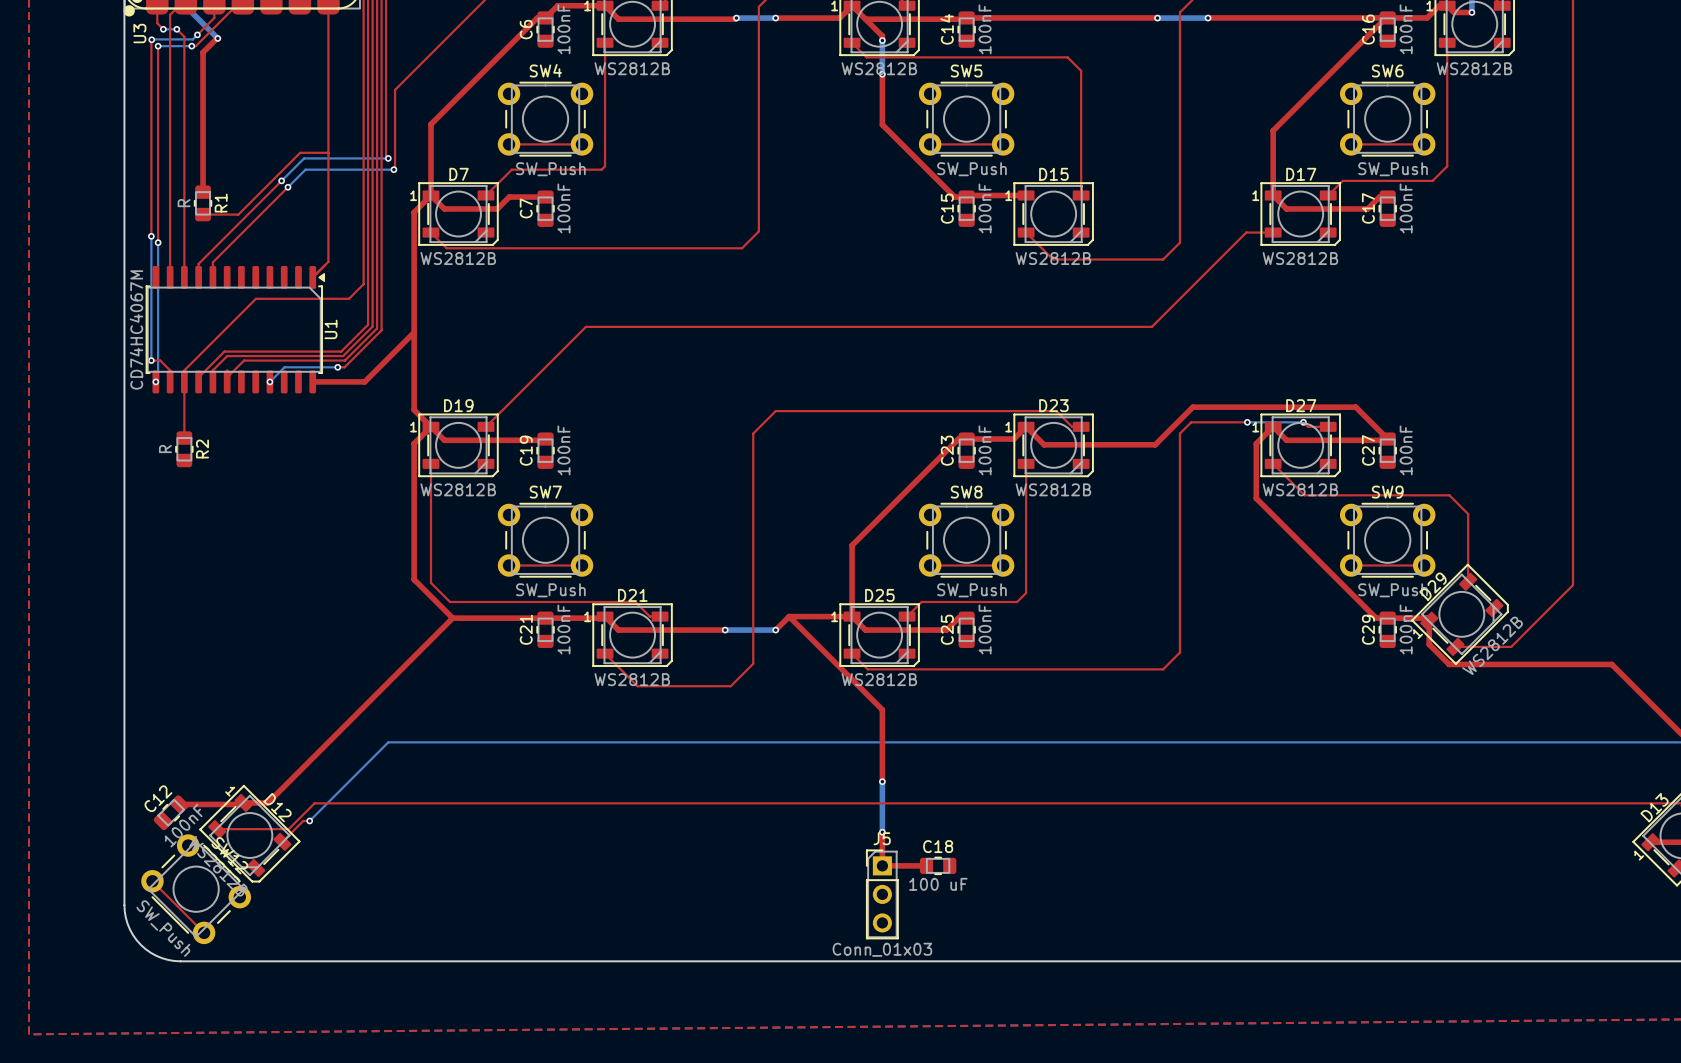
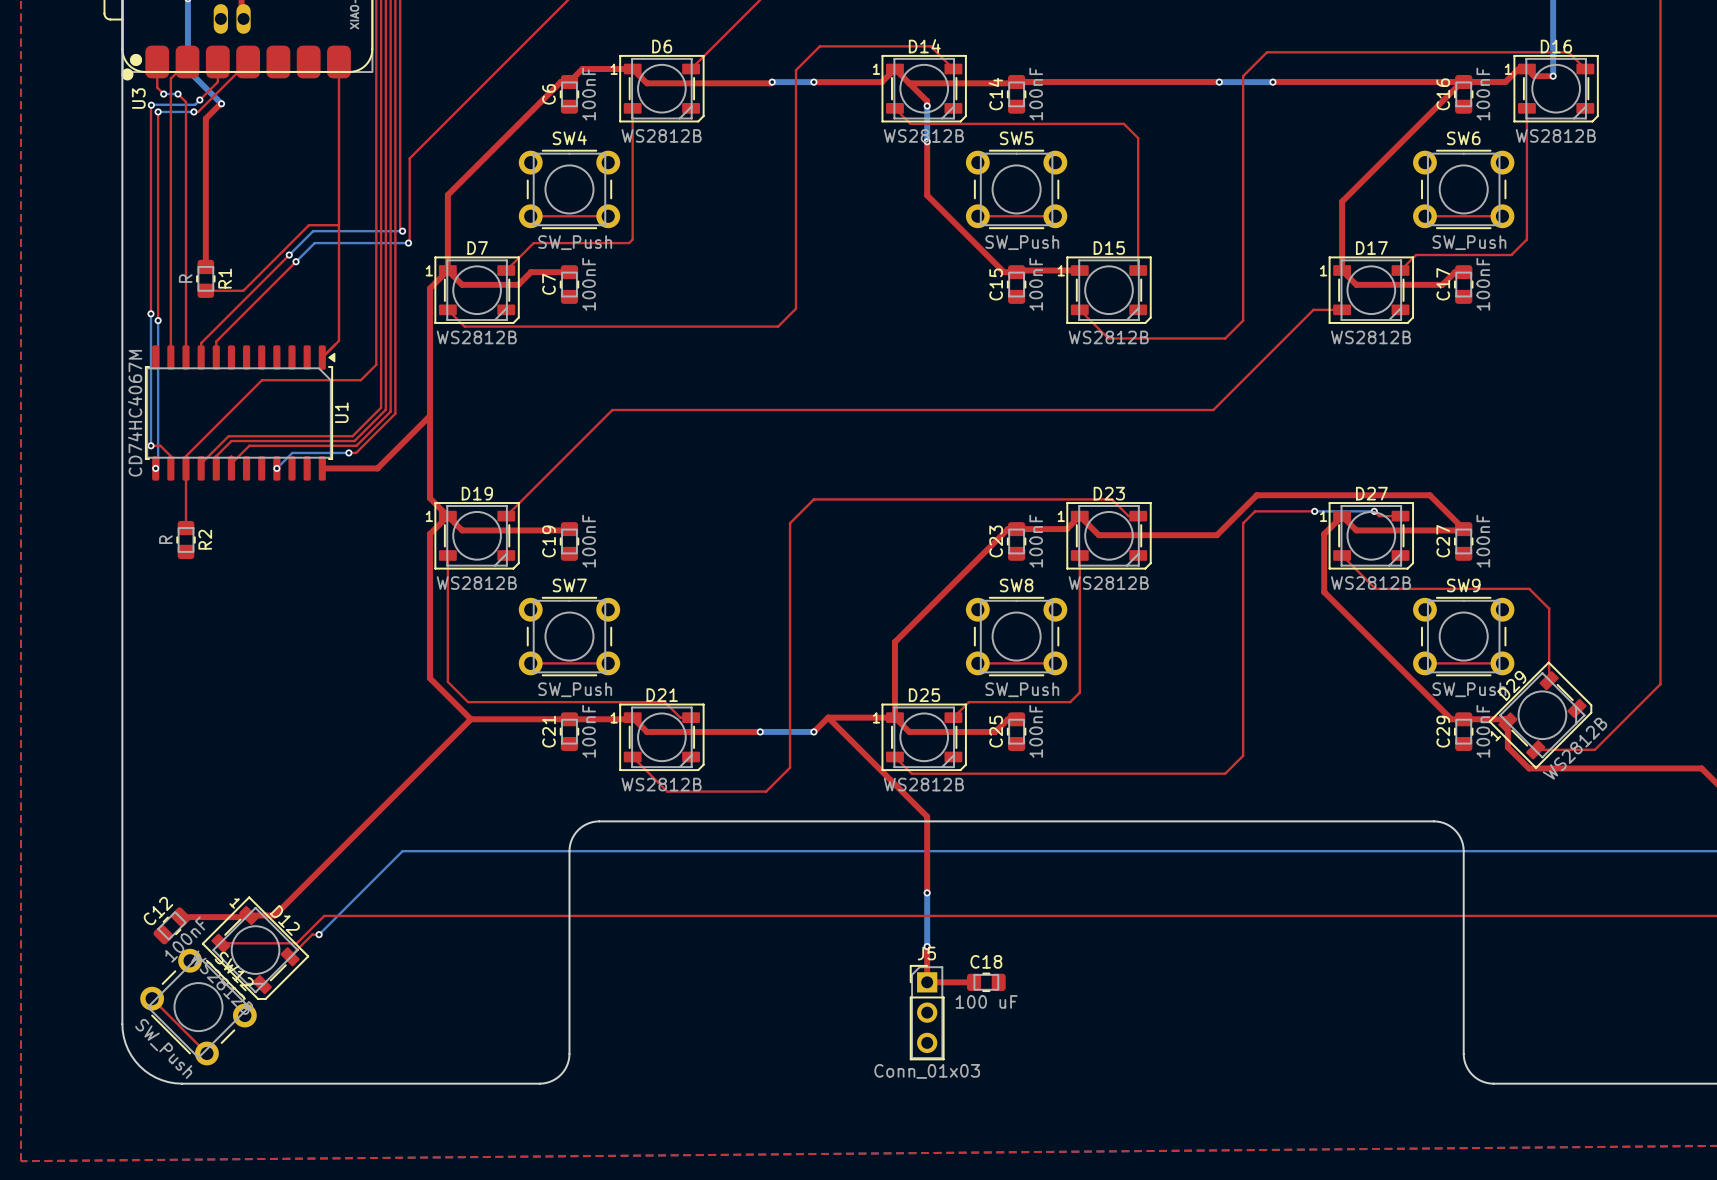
board edge: (517, 961) (1415, 961) -> (539, 1083) (549, 1082) (558, 1077) (564, 1069) (568, 1060) (569, 847) (572, 838) (578, 830) (586, 824) (599, 821) (1433, 821) (1443, 823) (1457, 832) (1463, 847) (1464, 1060) (1468, 1069) (1474, 1077) (1483, 1082) (1493, 1083)

